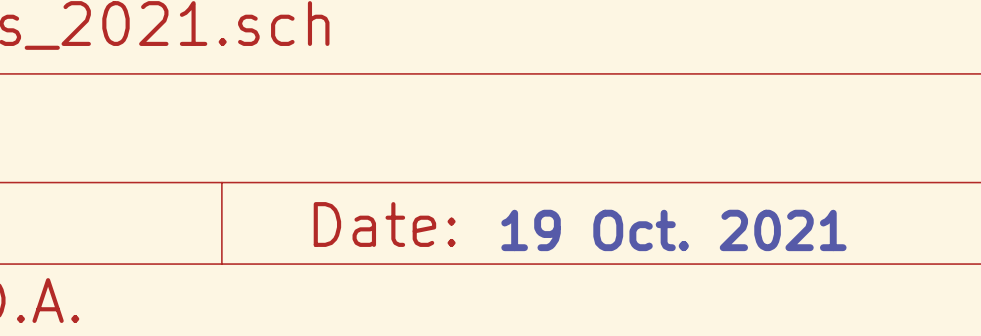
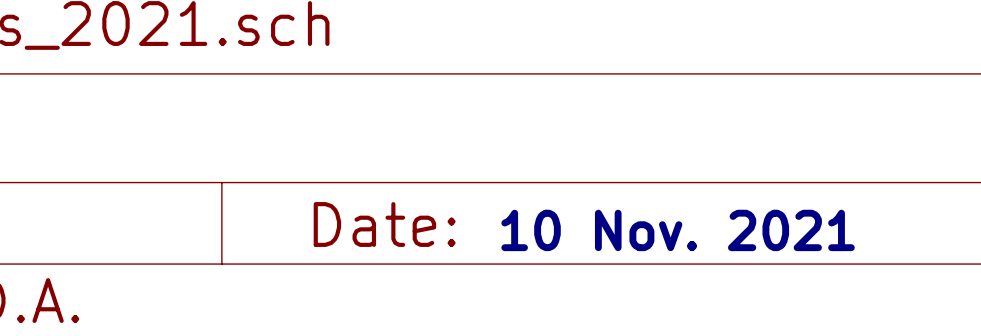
text: 19 Oct. 2021 (673, 230) -> 10 Nov. 2021 (678, 230)

